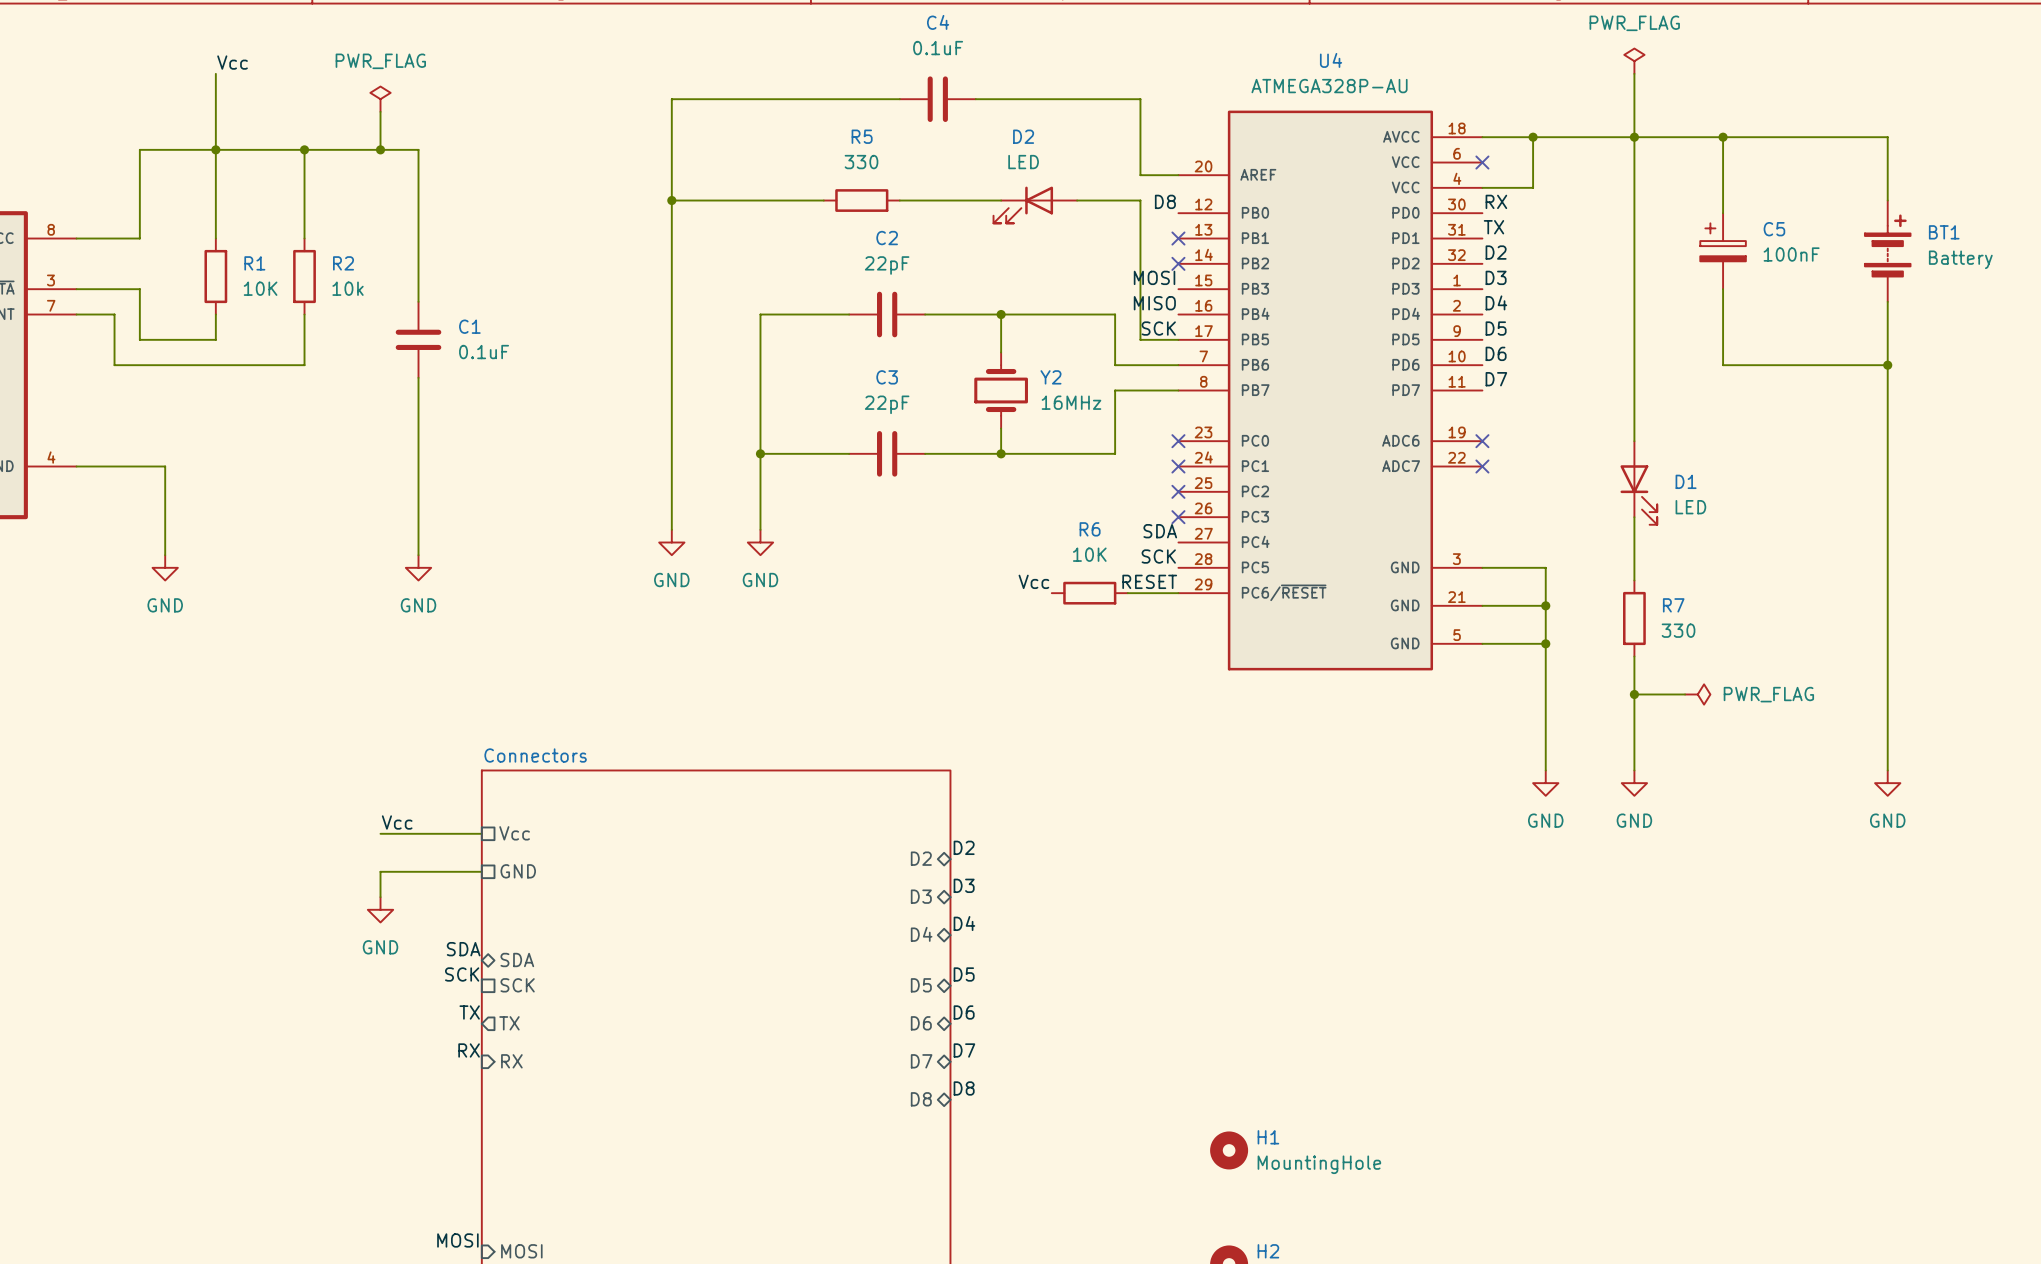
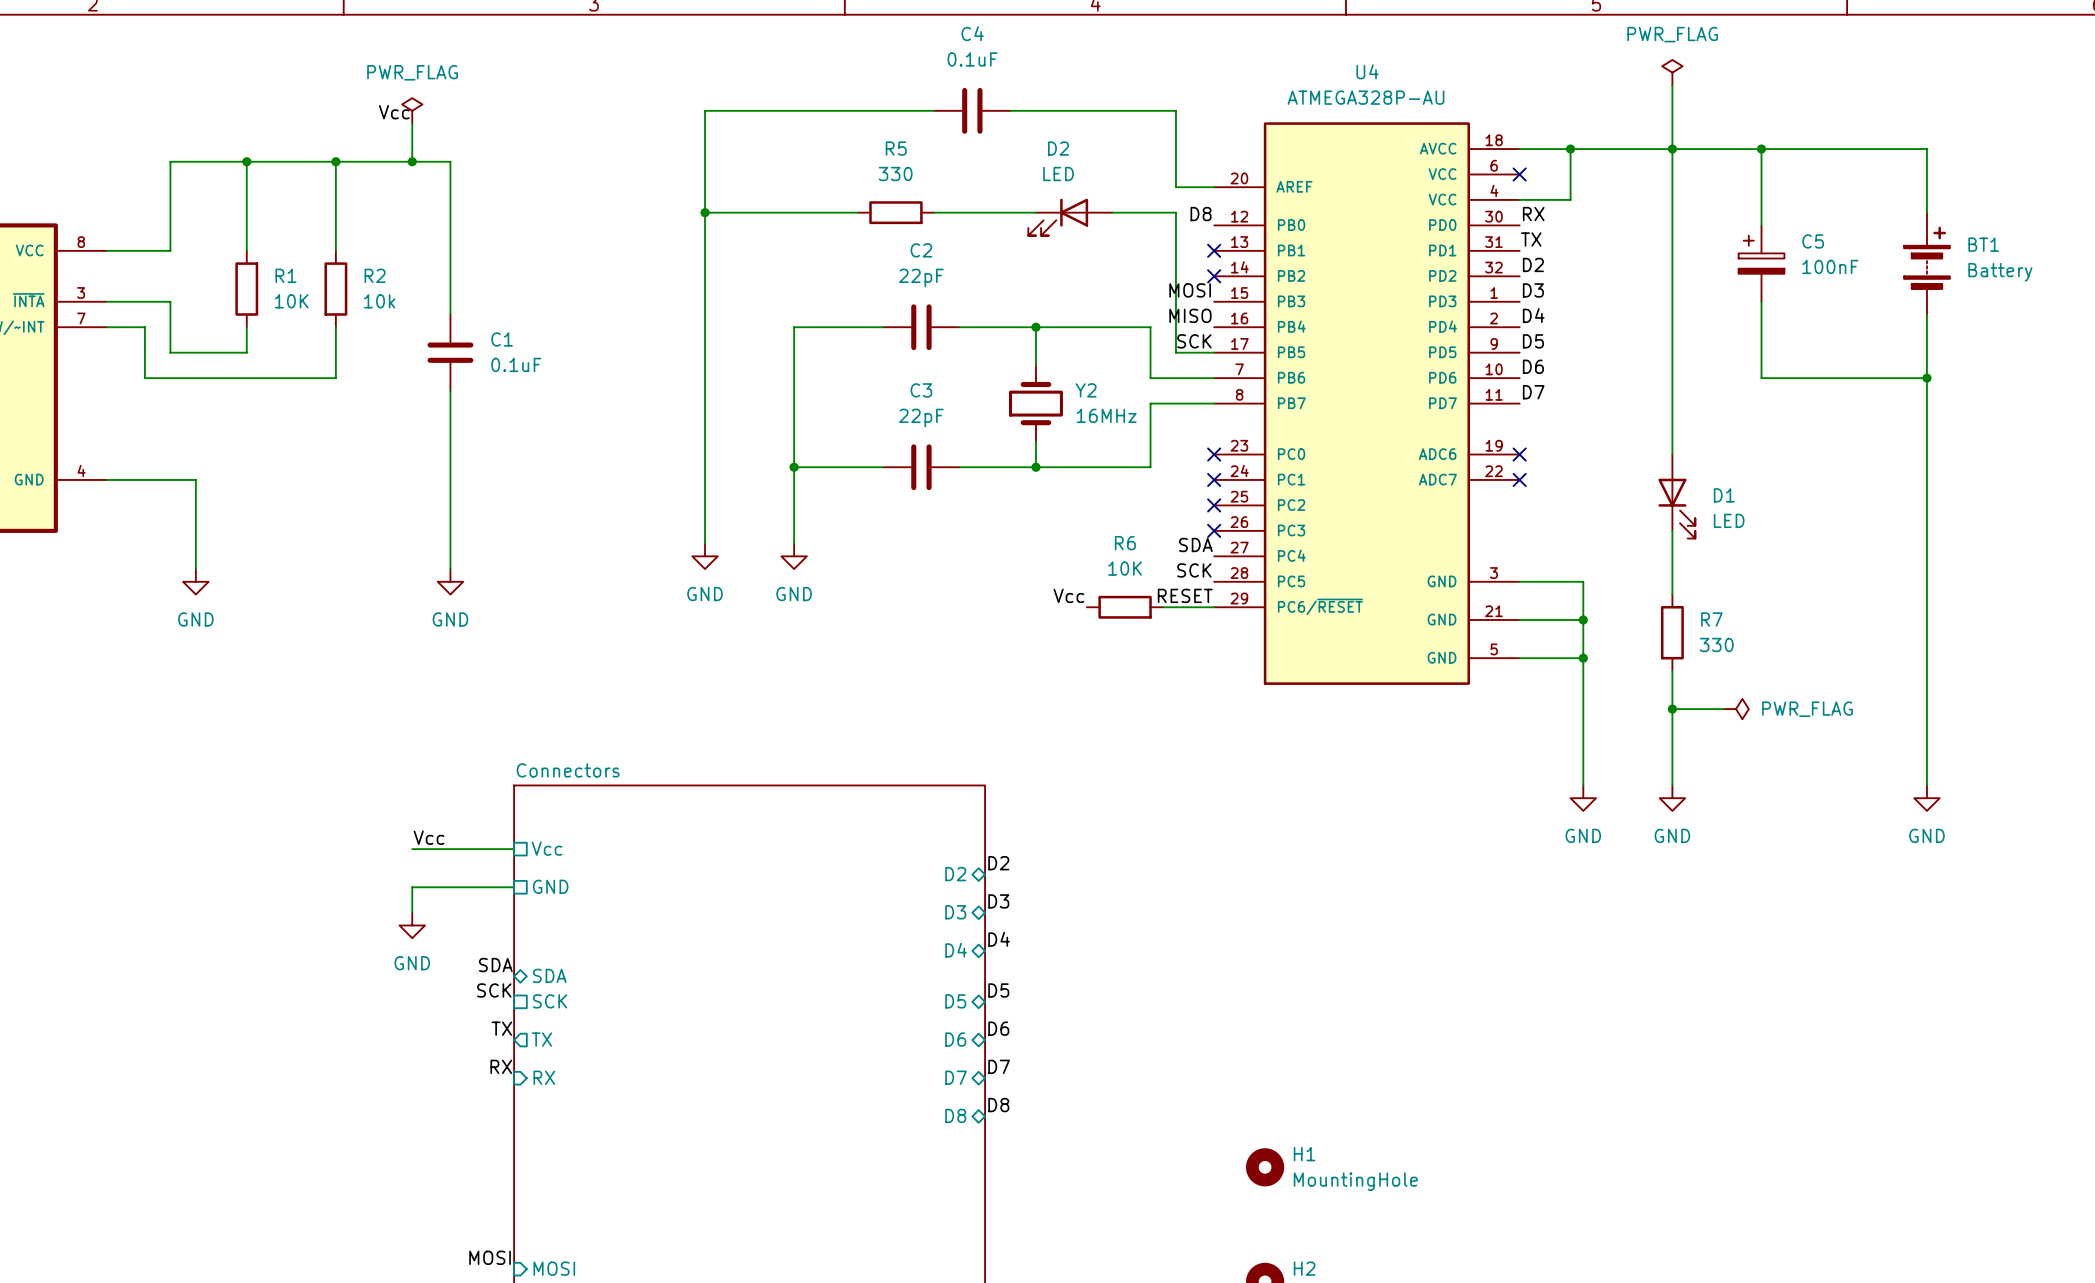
label position: Vcc (232, 62) -> Vcc (394, 112)
wire: (215, 73) (215, 149) -> none

